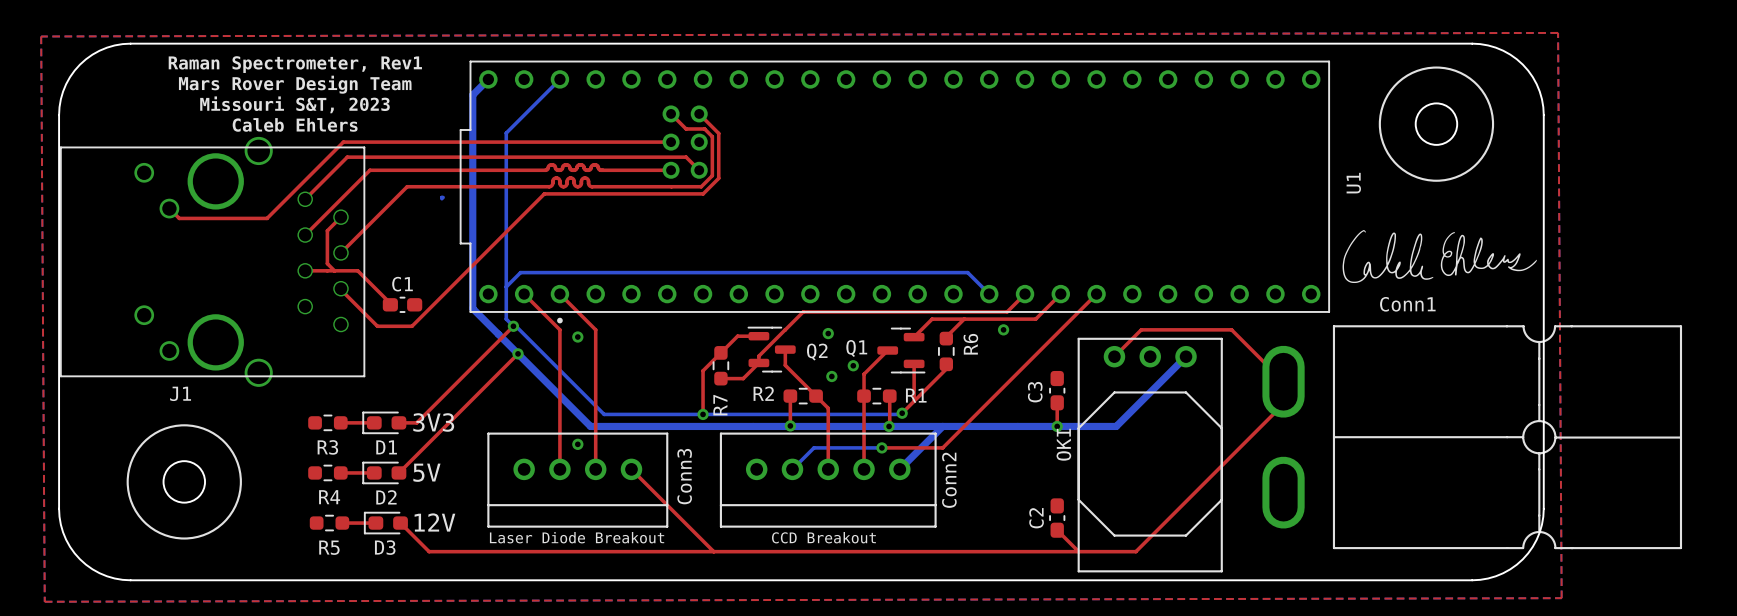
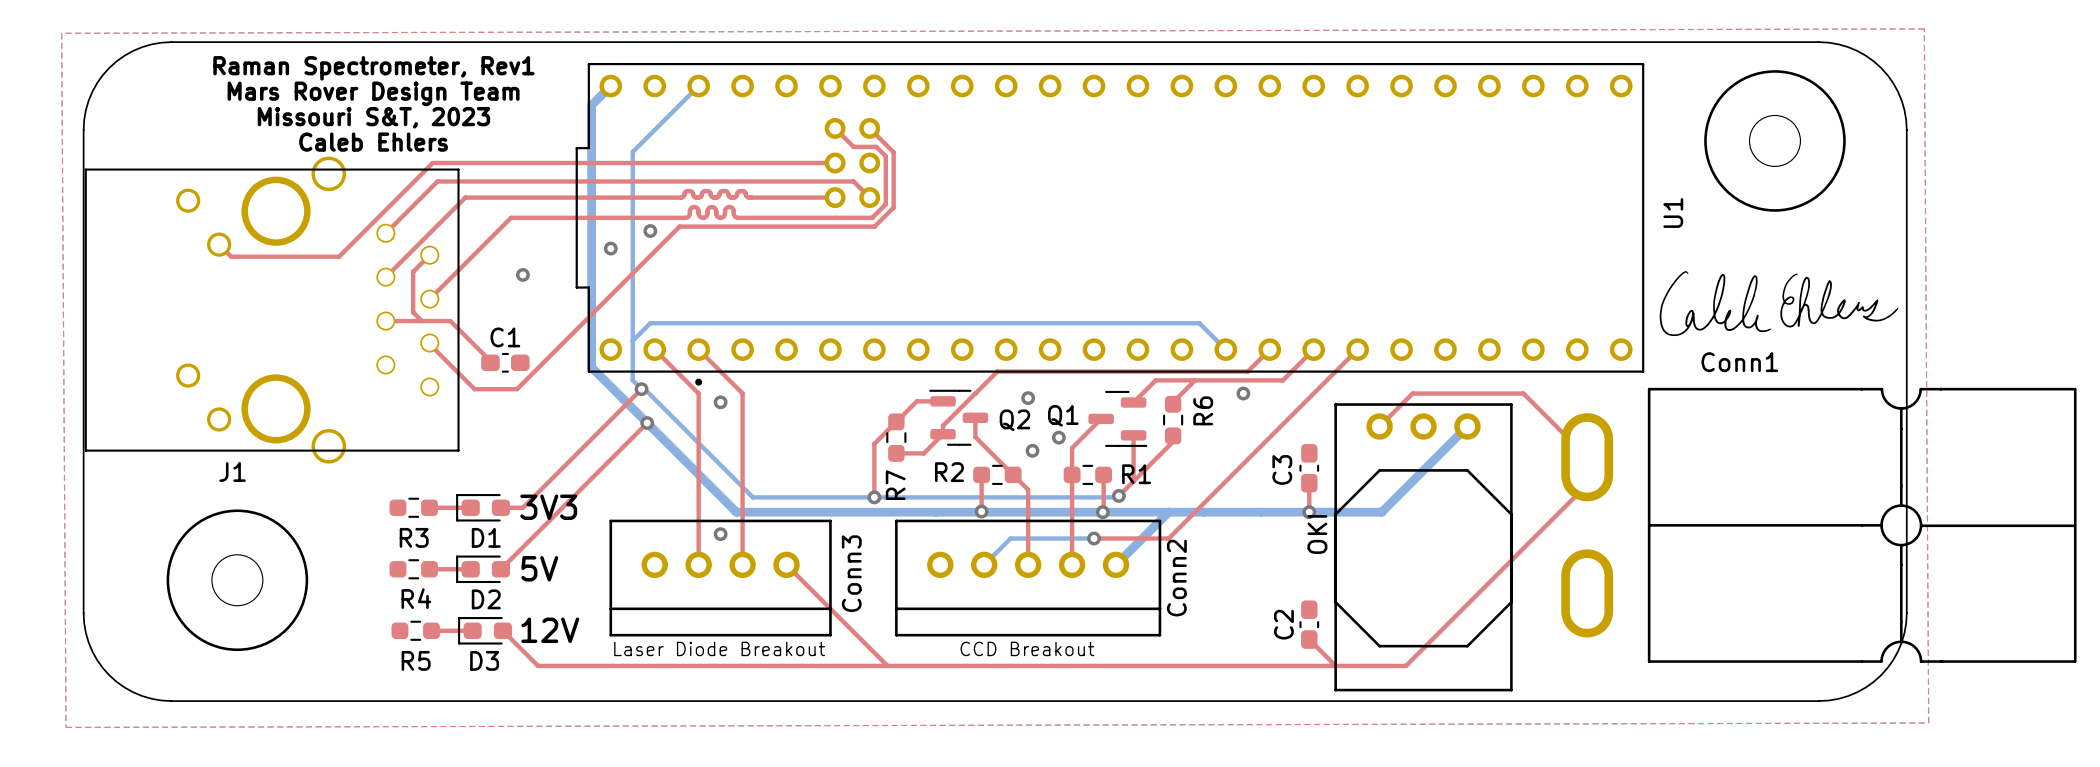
bottom track: (443, 197) (441, 198) -> none
via: none -> (650, 231)
via: none -> (610, 248)
via: none -> (522, 274)

